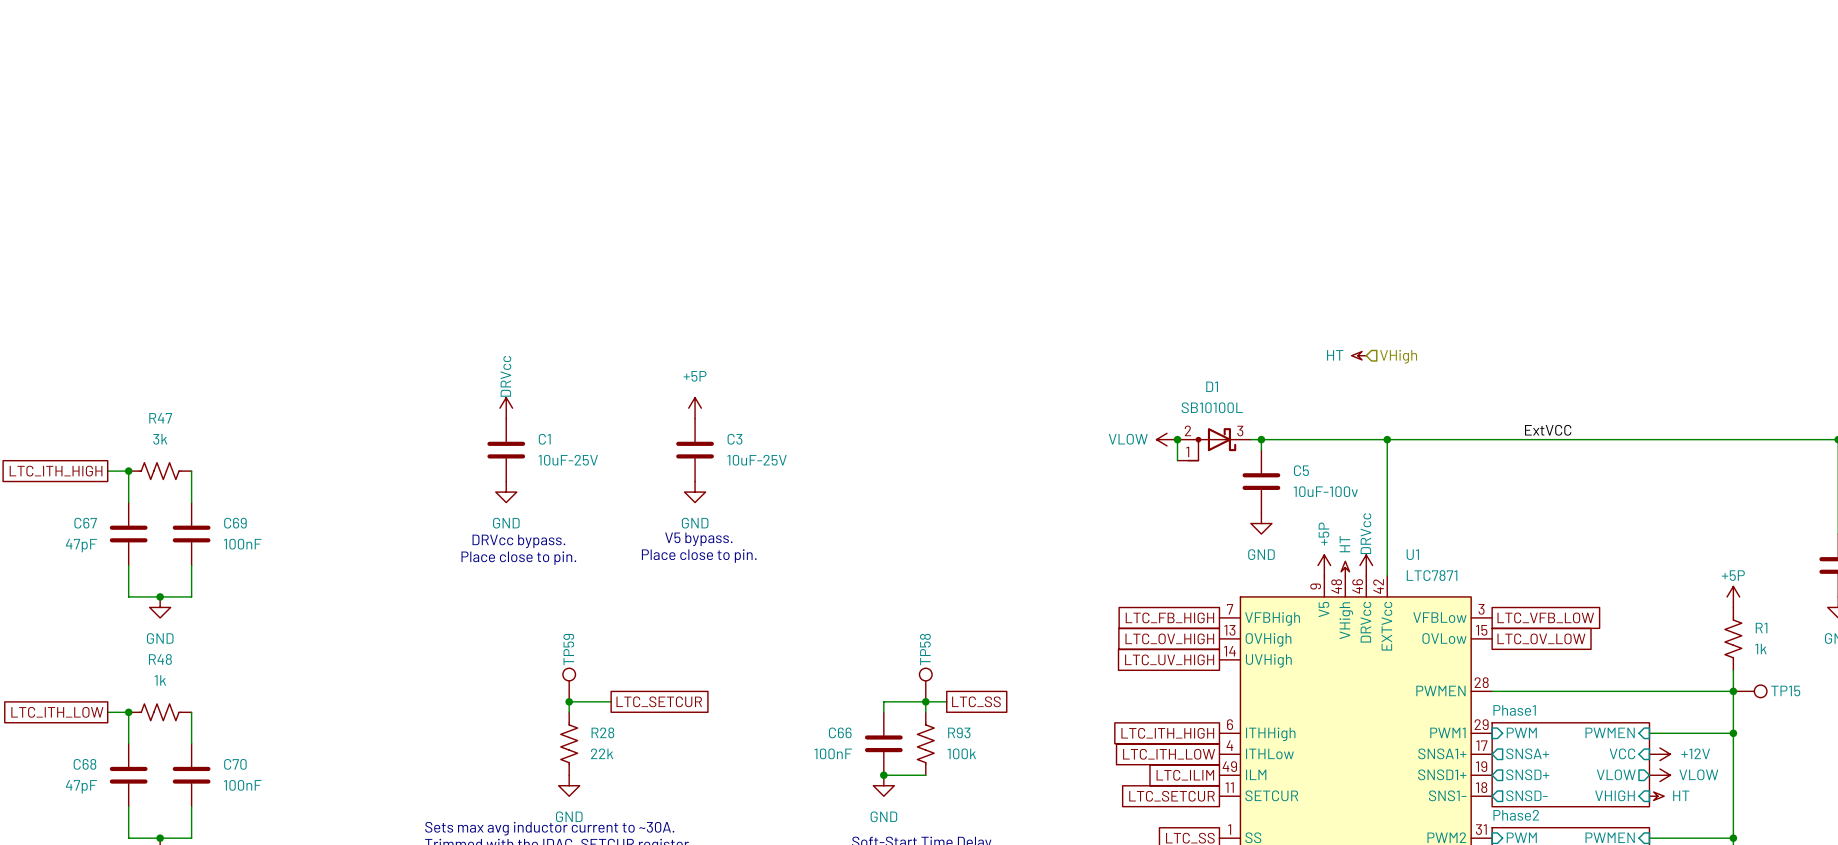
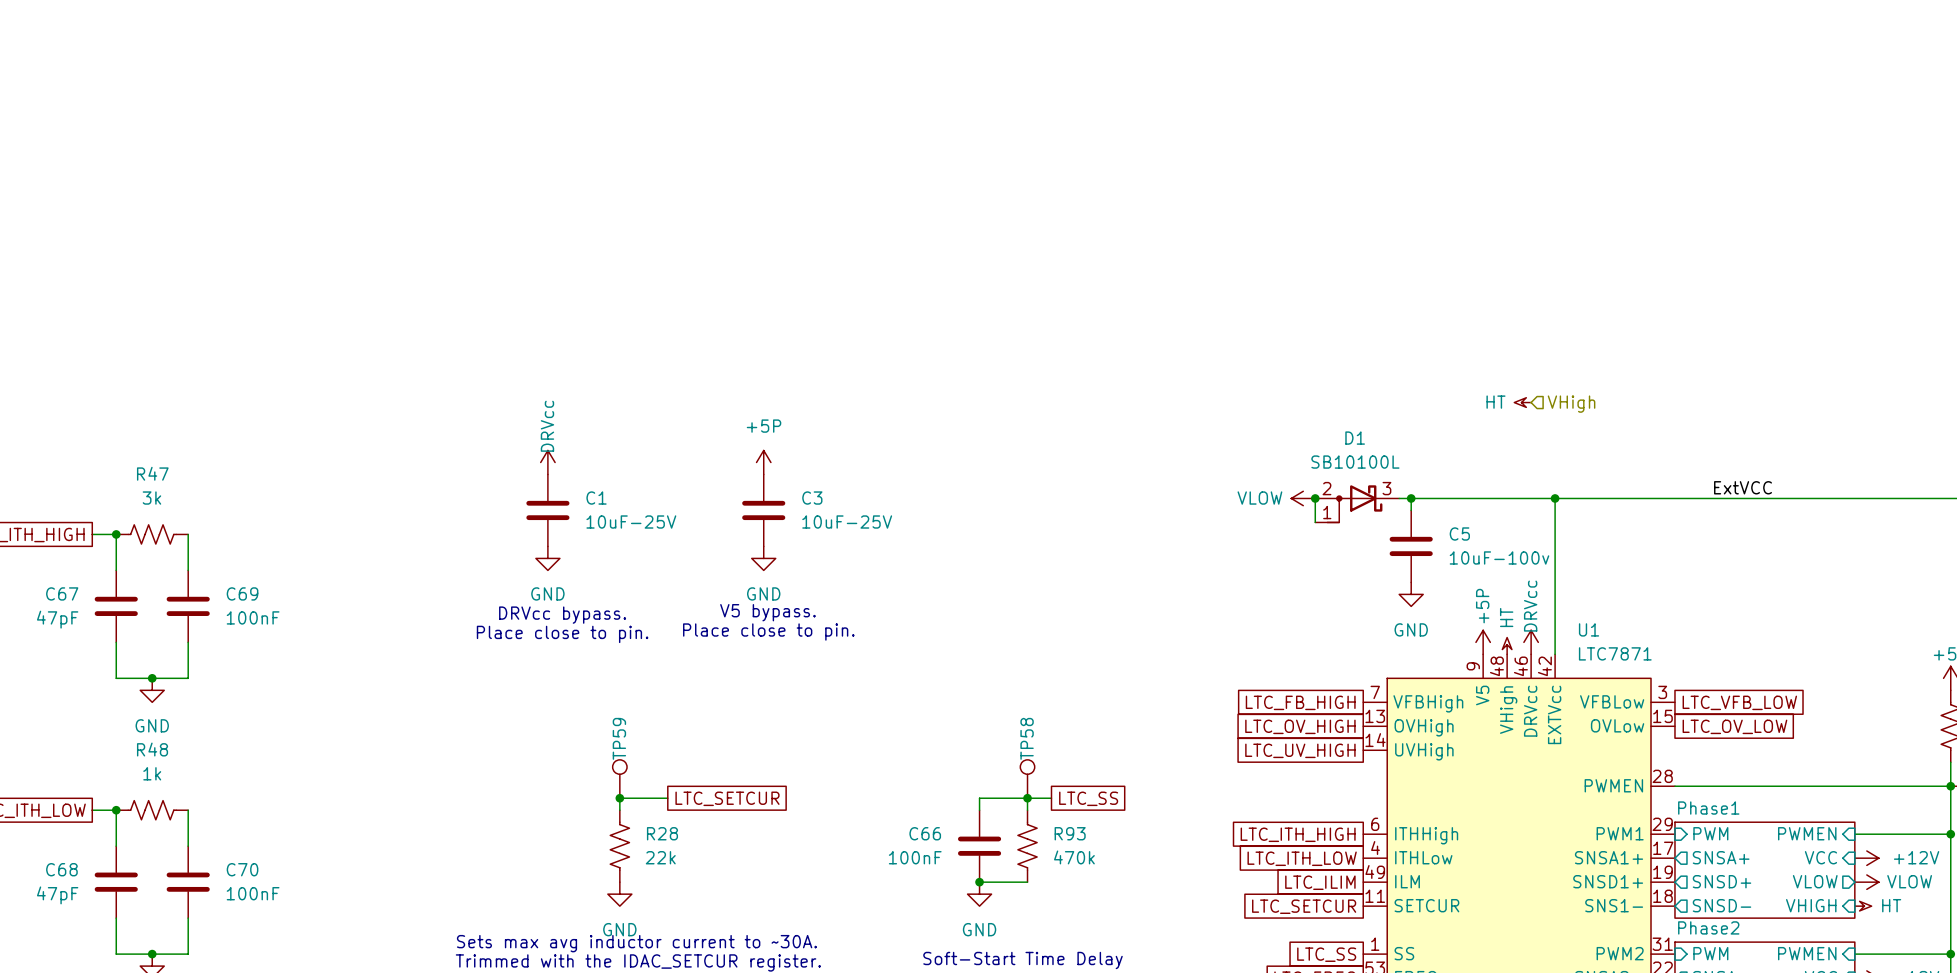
R93 value: 100k (961, 753) -> 470k (1074, 857)

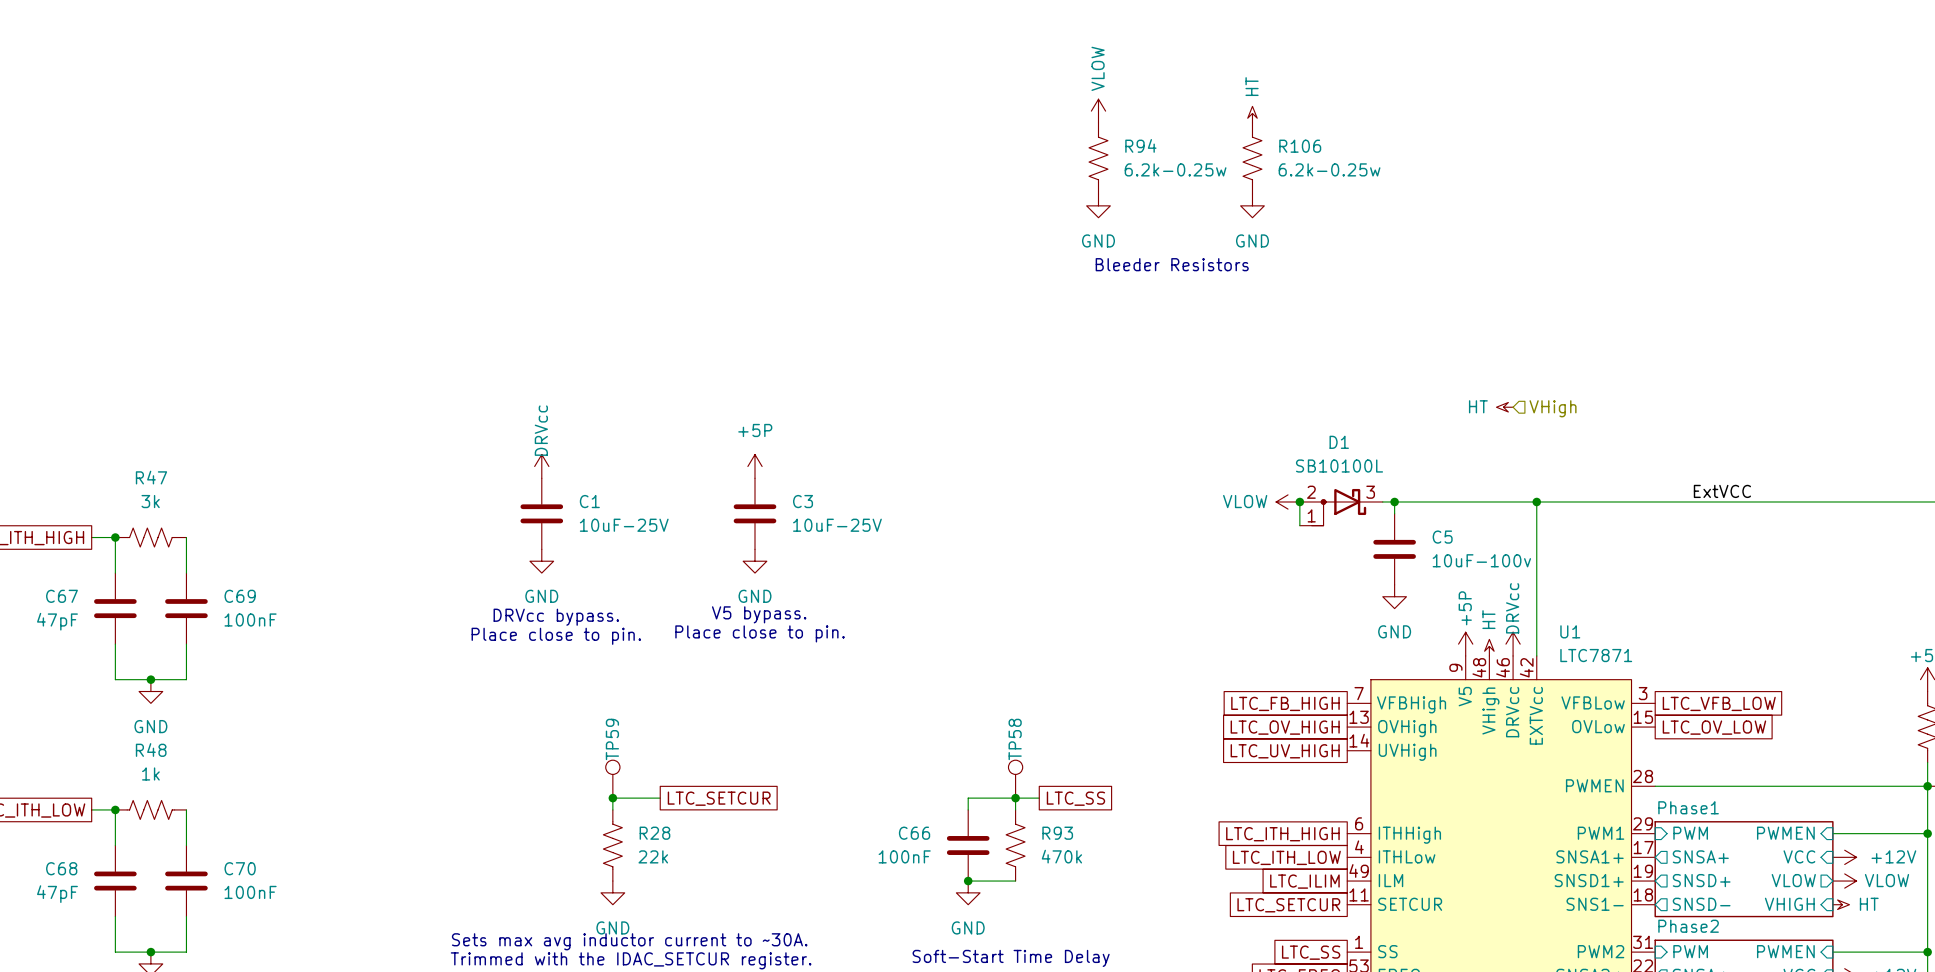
power symbol: none -> VLOW (1098, 111)
power symbol: none -> HT (1252, 114)
R94: none -> 6.2k-0.25w (1098, 158)
R106: none -> 6.2k-0.25w (1252, 158)
power symbol: none -> GND (1098, 205)
power symbol: none -> GND (1252, 205)
text: none -> Bleeder Resistors (1172, 264)

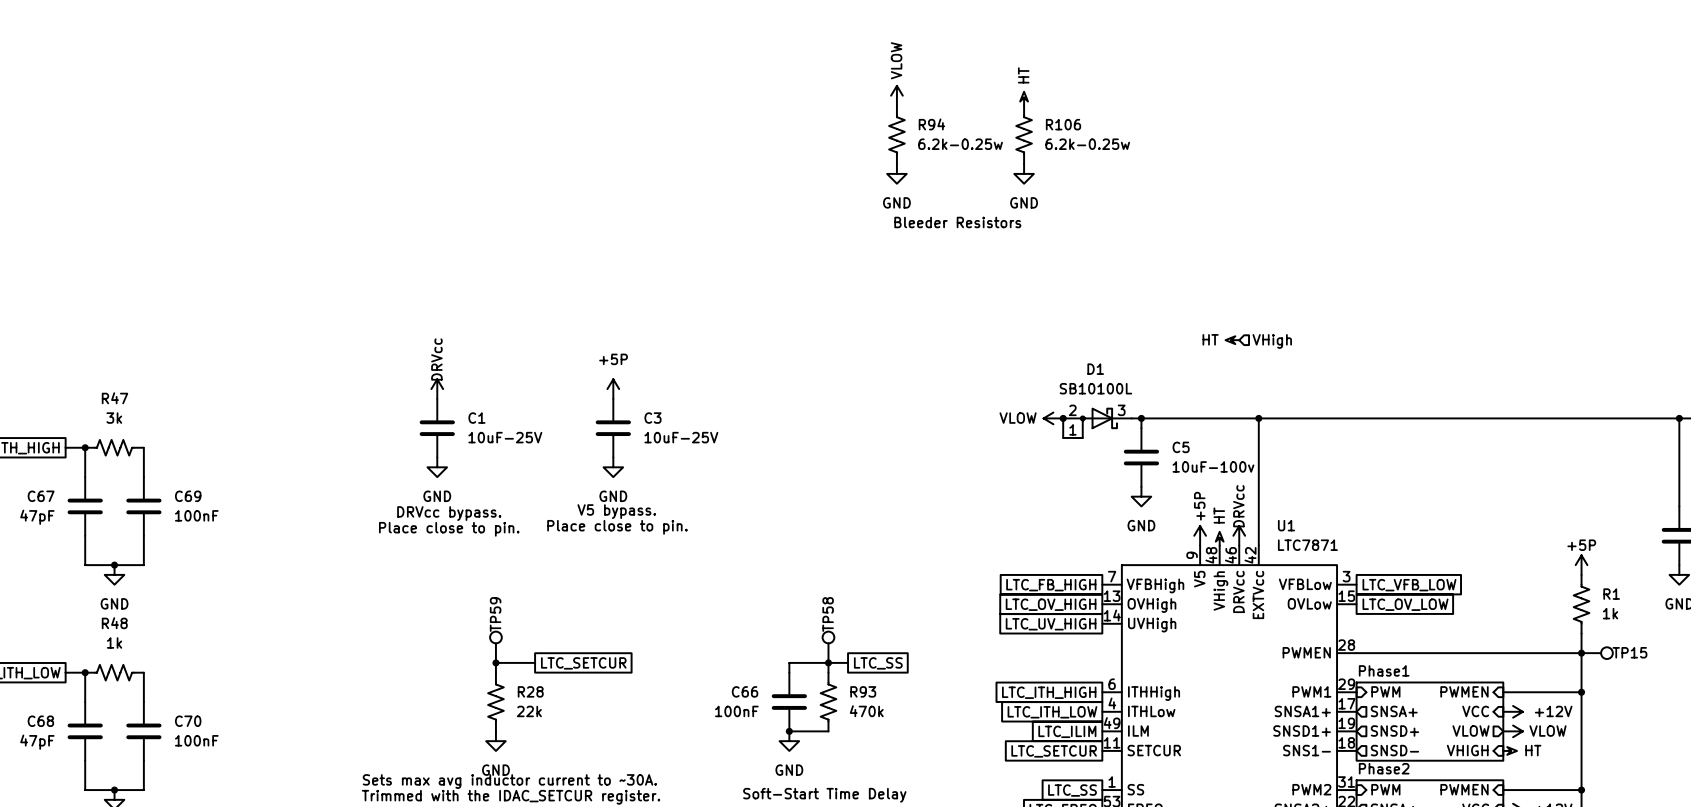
label: ExtVCC (1722, 491) -> none

